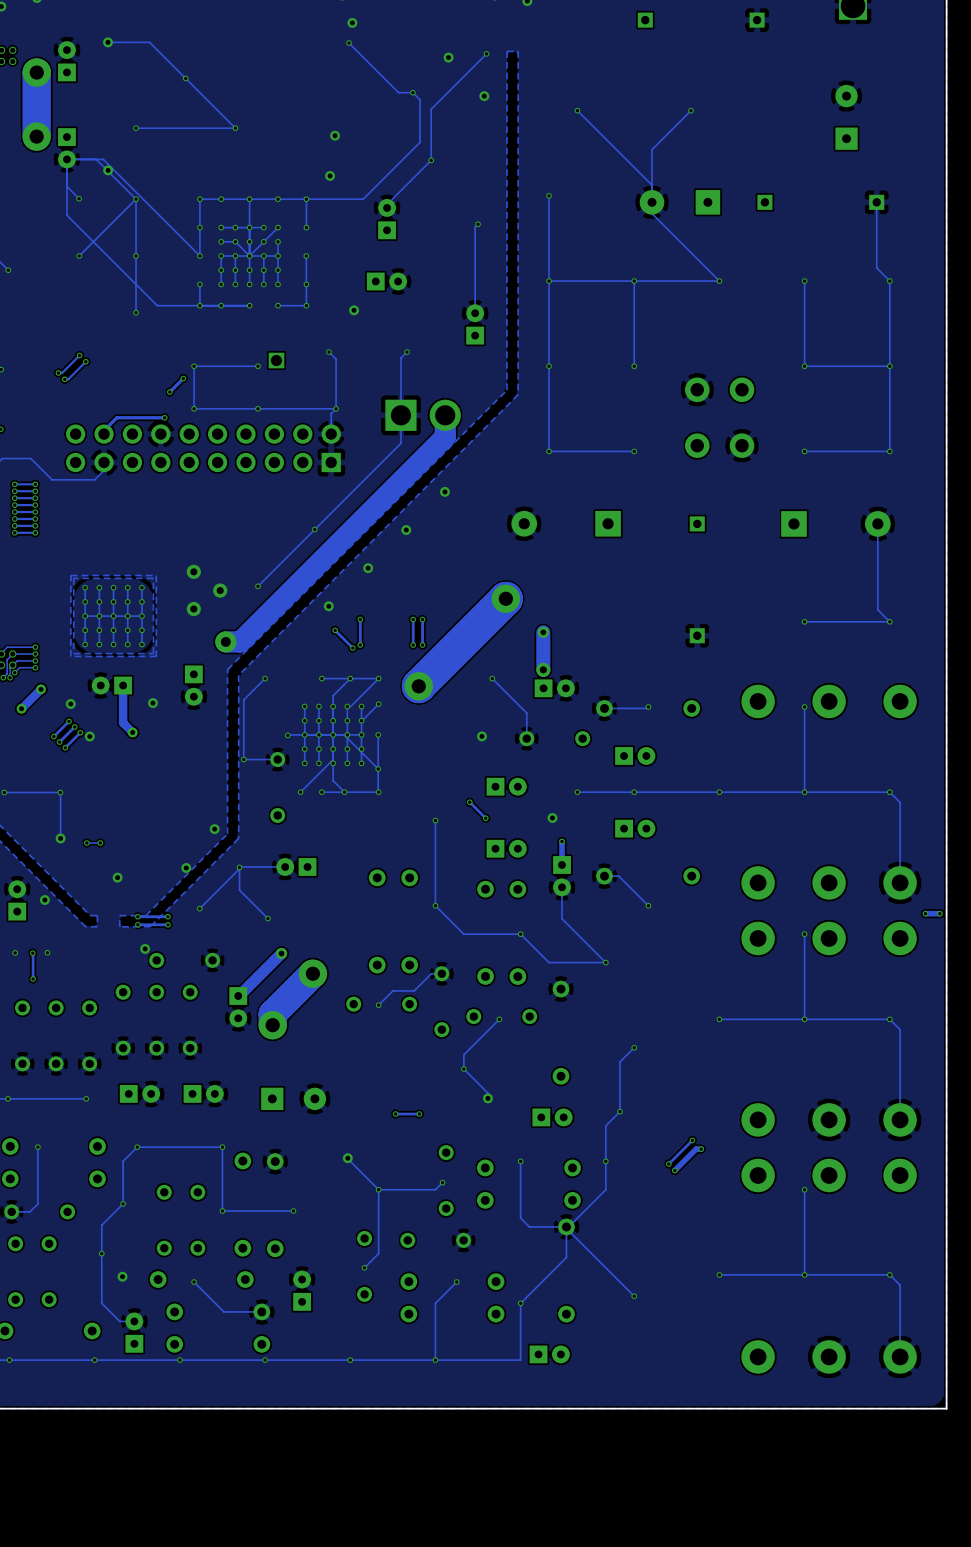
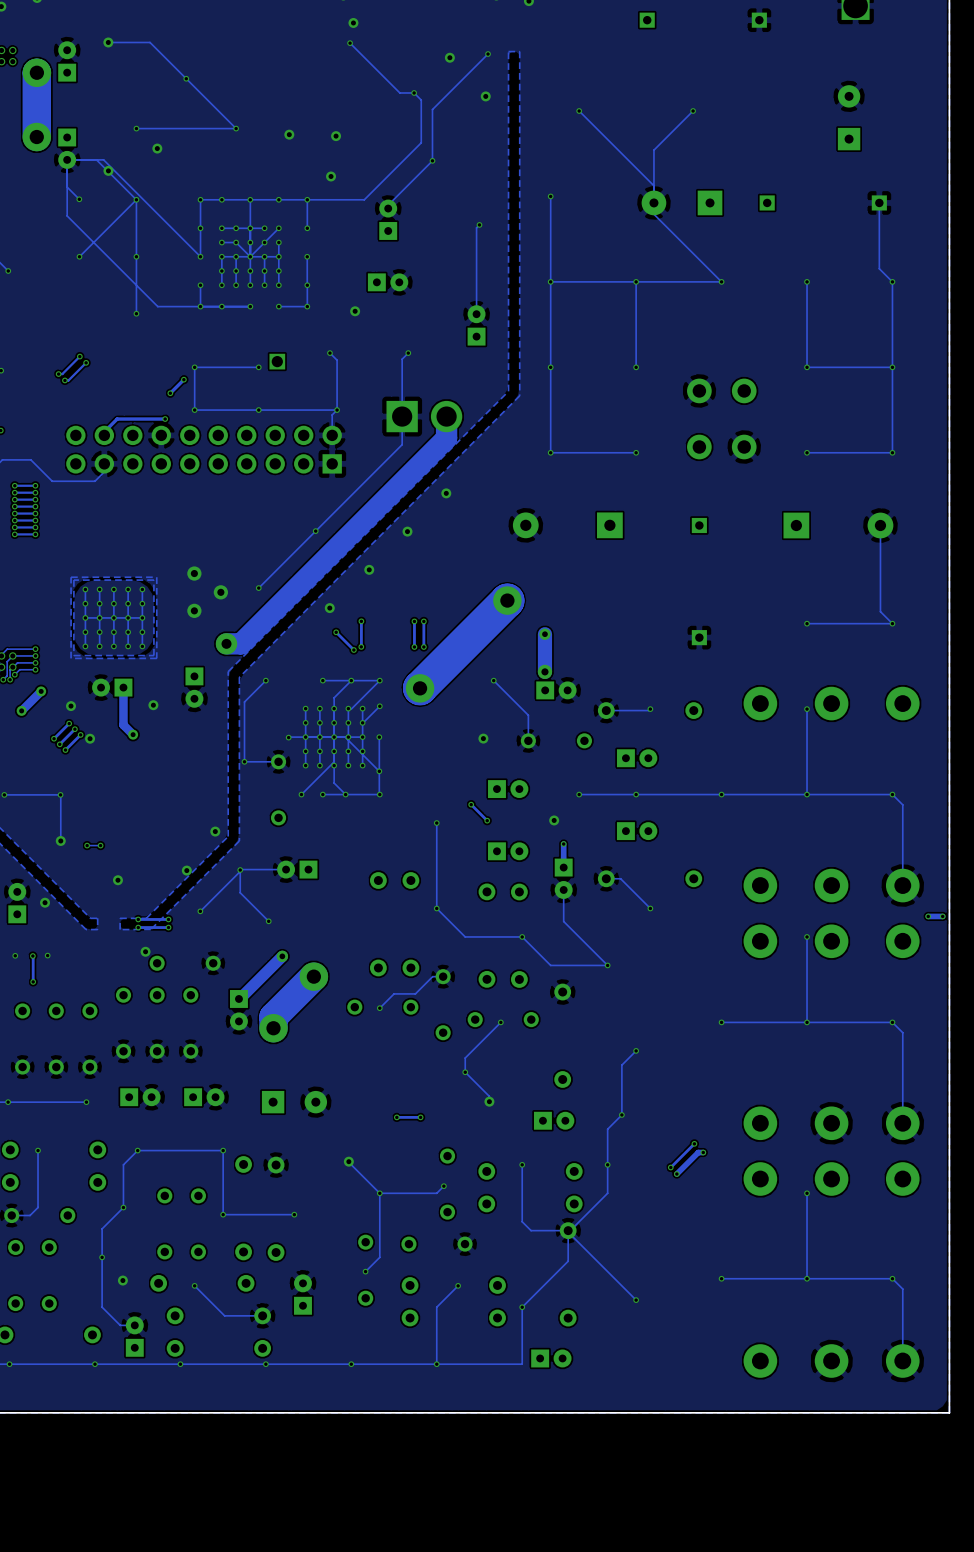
via: none -> (289, 134)
via: none -> (157, 148)

